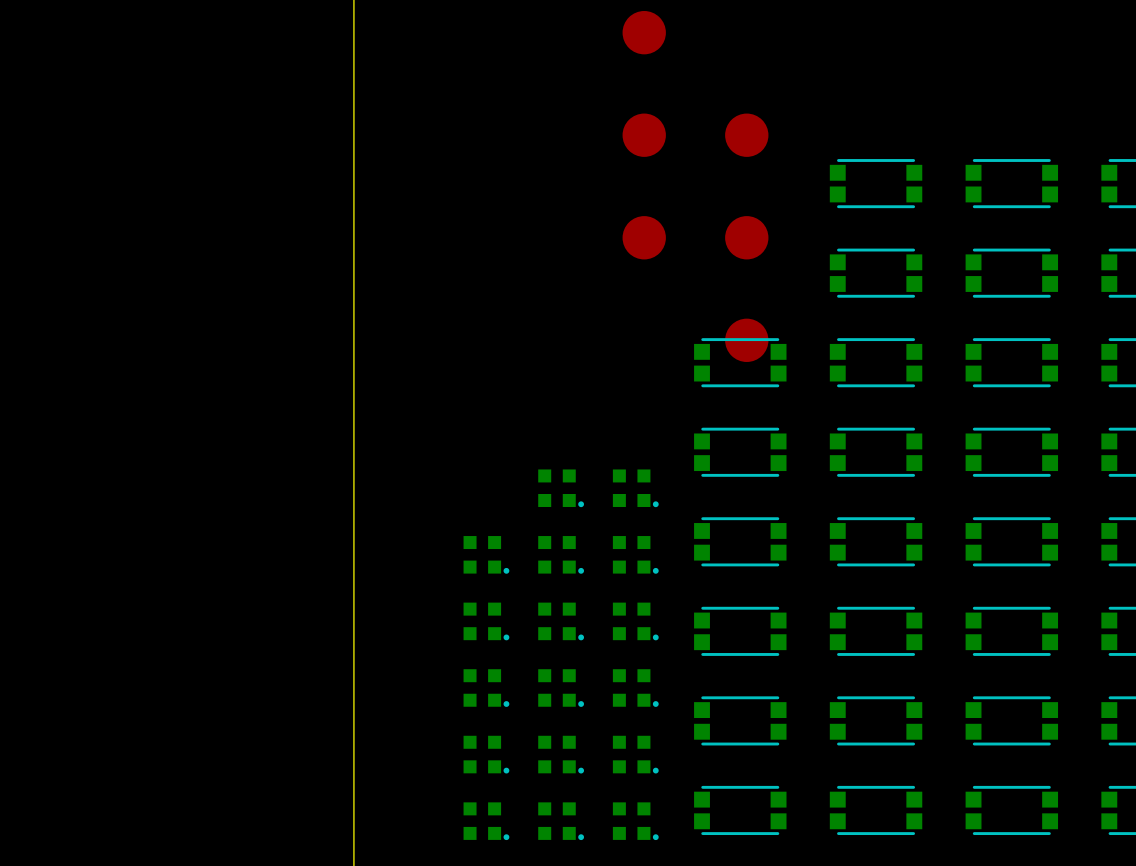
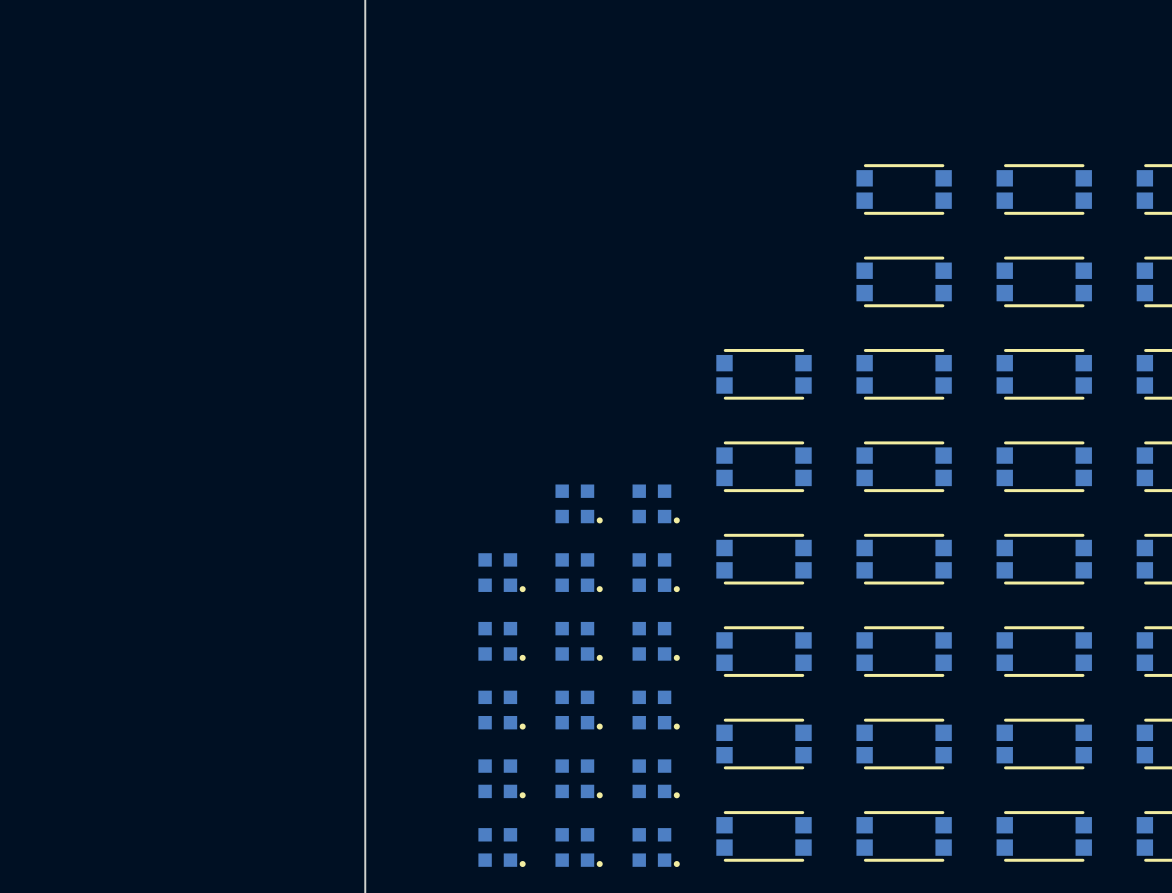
part: (644, 32) -> none
part: (644, 135) -> none
part: (746, 135) -> none
part: (644, 237) -> none
part: (746, 237) -> none
part: (746, 340) -> none

